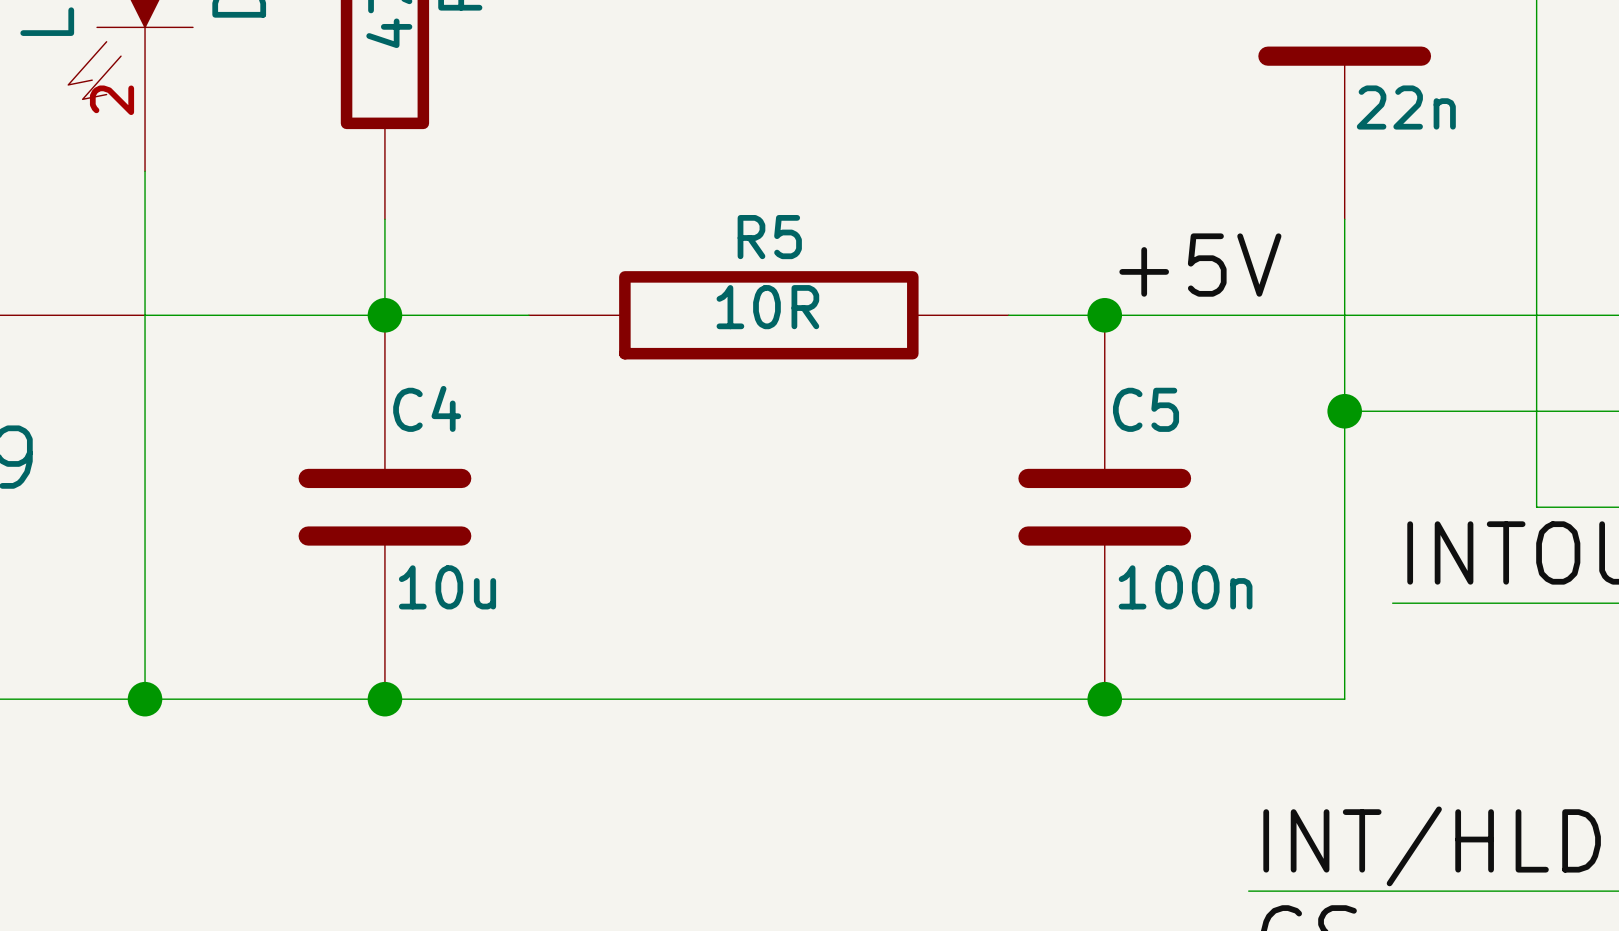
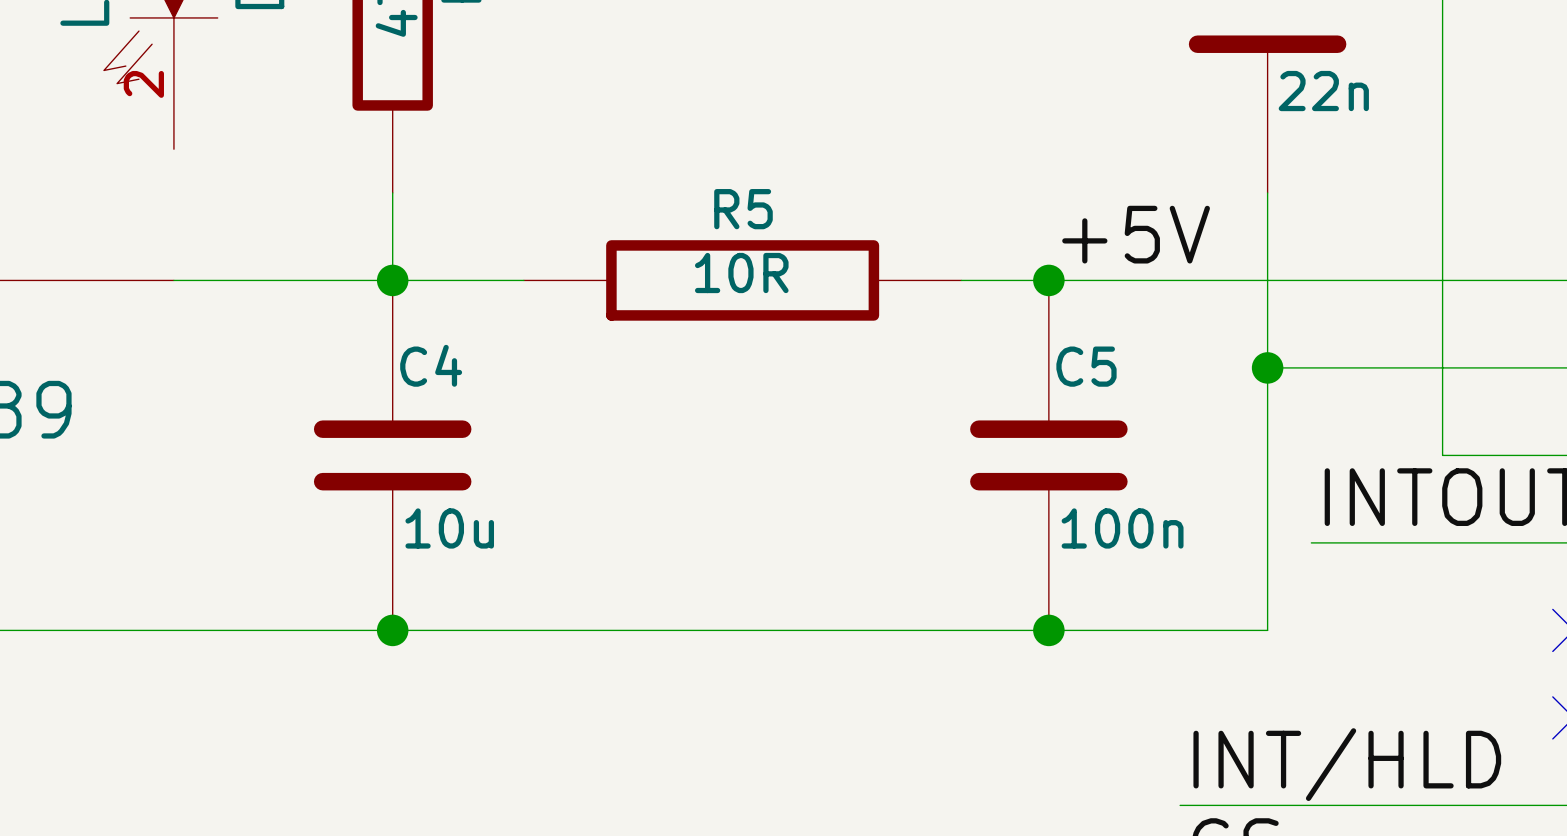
wire: (145, 171) (145, 699) -> none
junction: (145, 699) -> none

